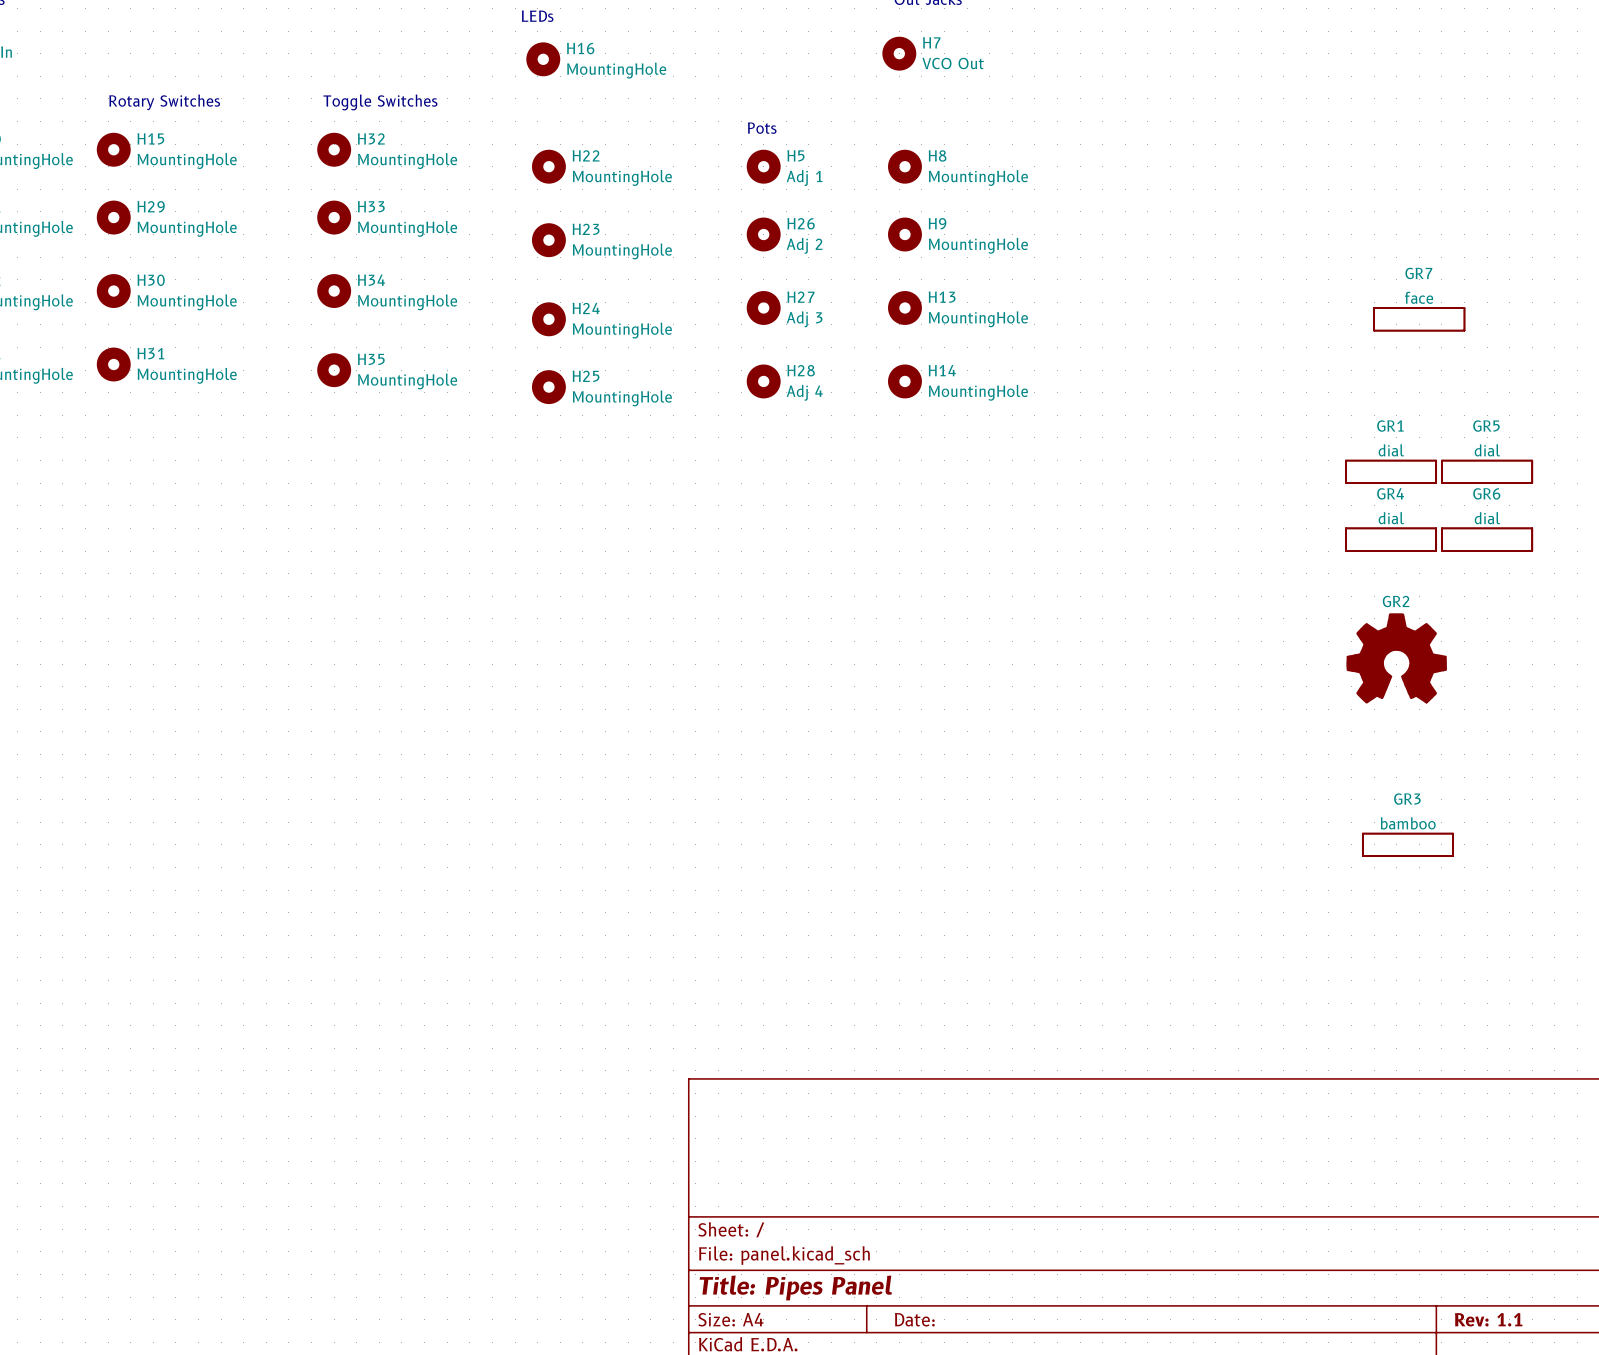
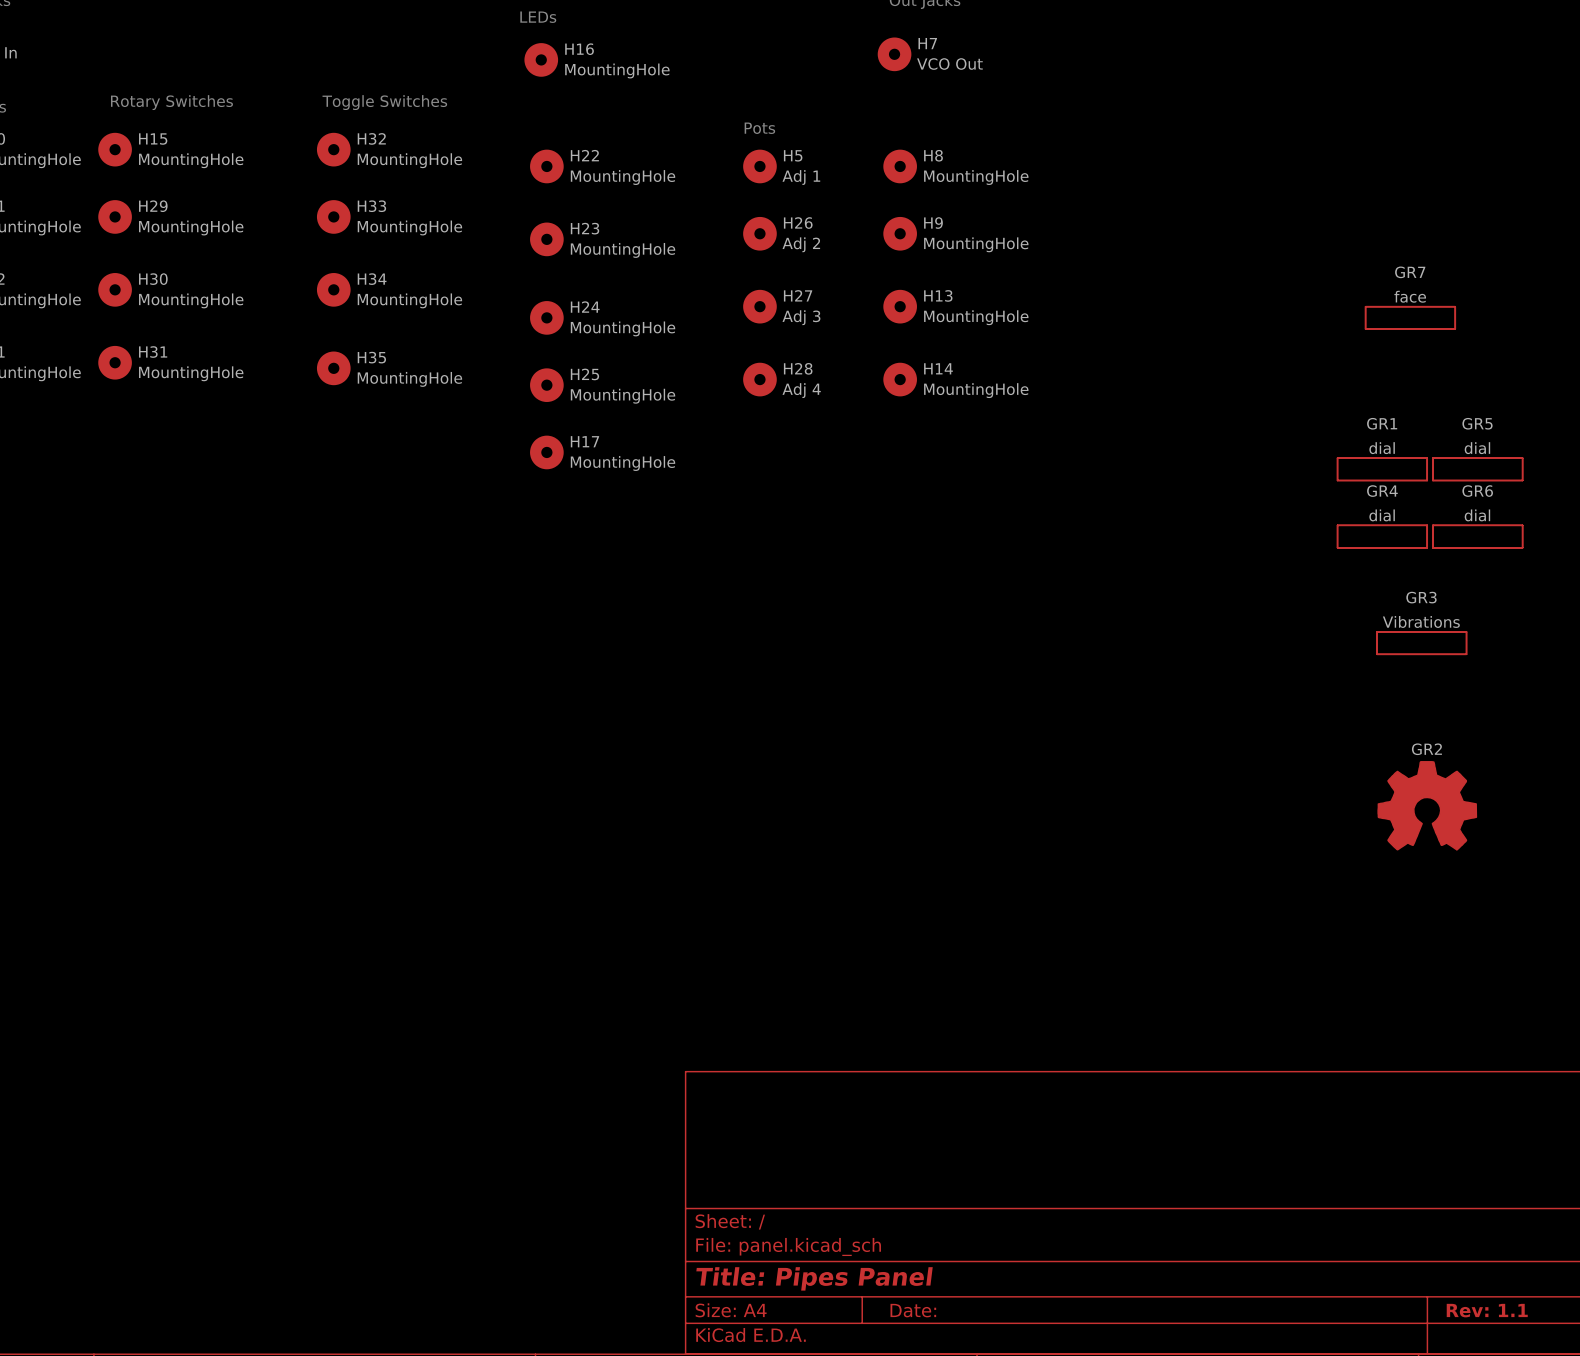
H17: none -> MountingHole (546, 452)
GR2 position: (1396, 658) -> (1427, 805)
GR3 value: bamboo (1408, 823) -> Vibrations (1421, 621)
GR3 position: (1407, 844) -> (1421, 643)

